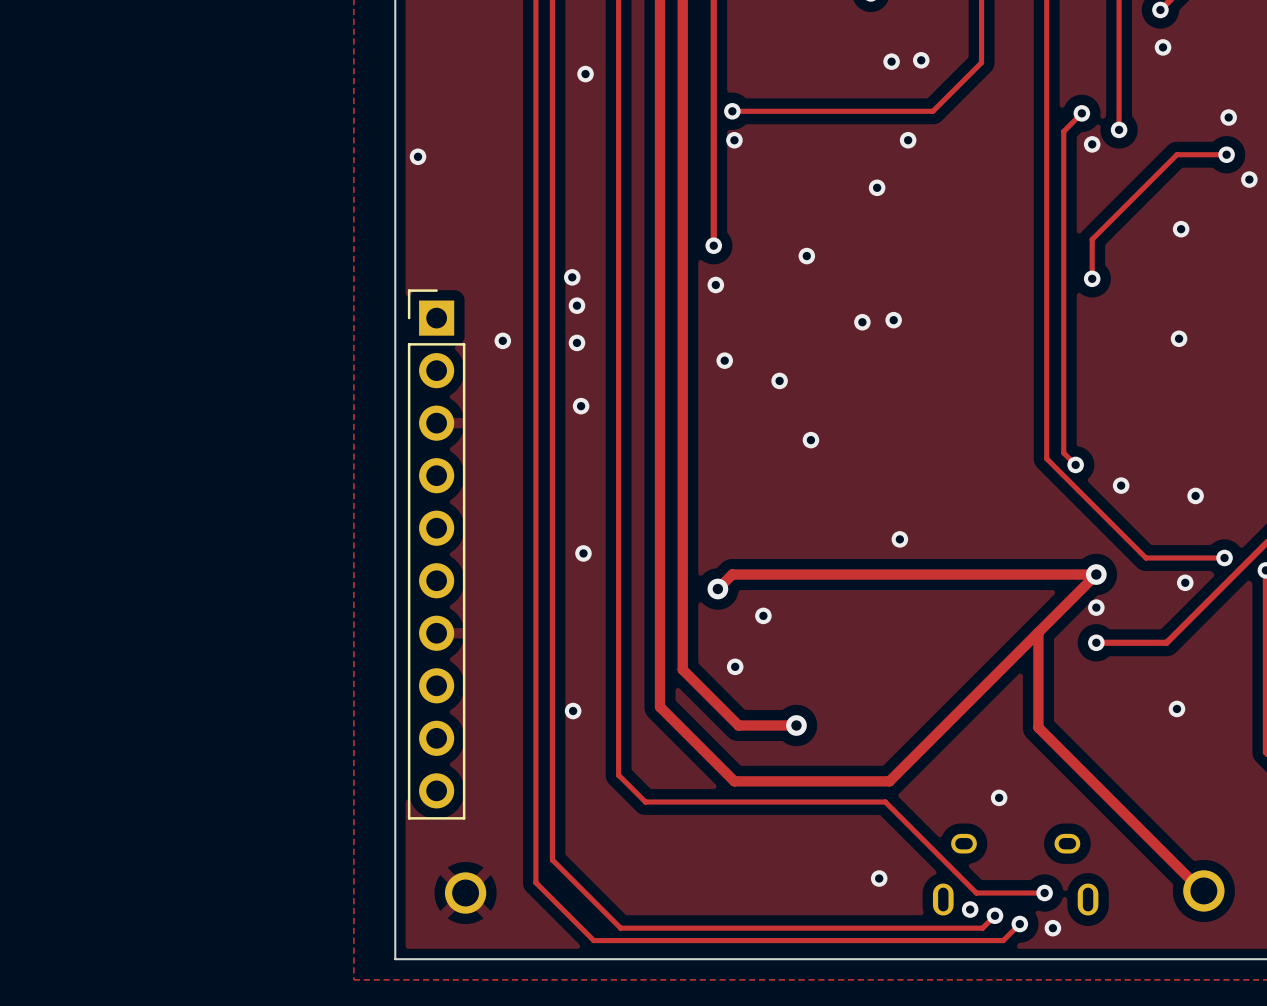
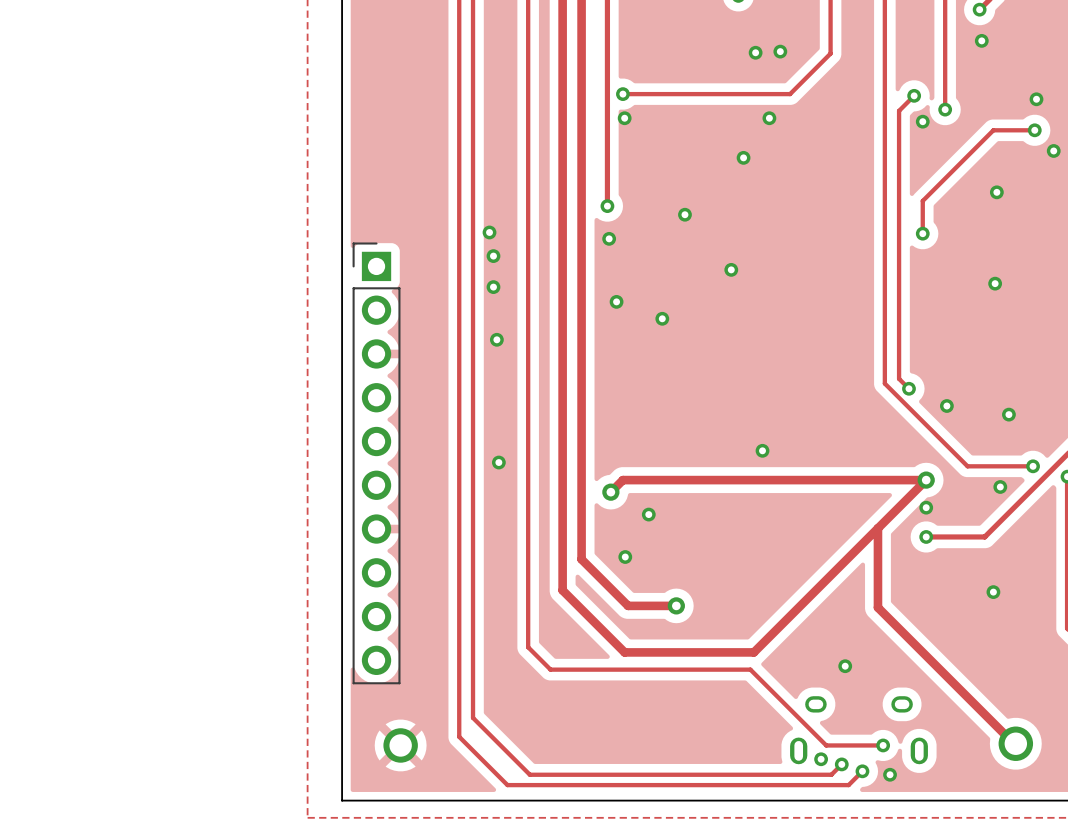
via: (585, 74) -> none
via: (418, 156) -> none
via: (893, 320) -> none
via: (502, 340) -> none
via: (810, 440) -> none
via: (573, 711) -> none
via: (879, 878) -> none

